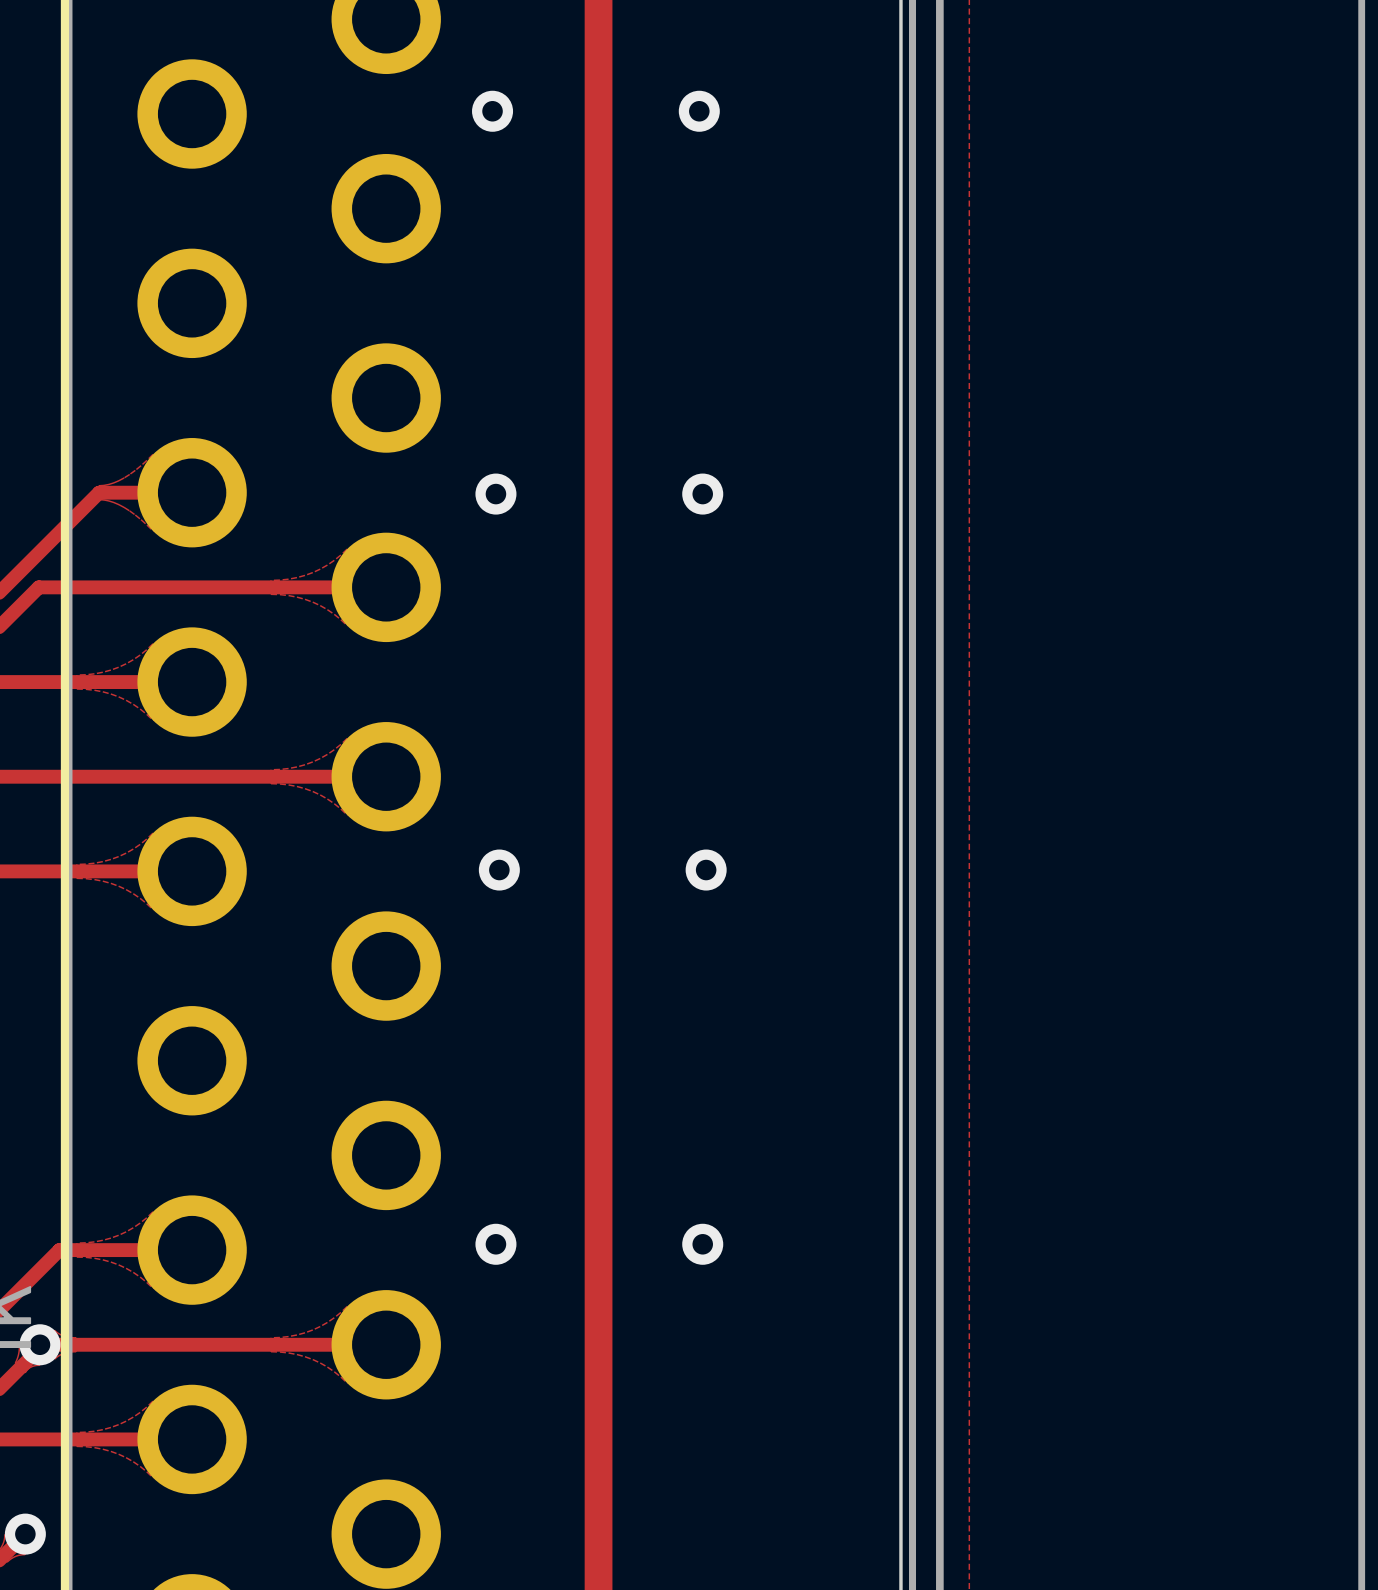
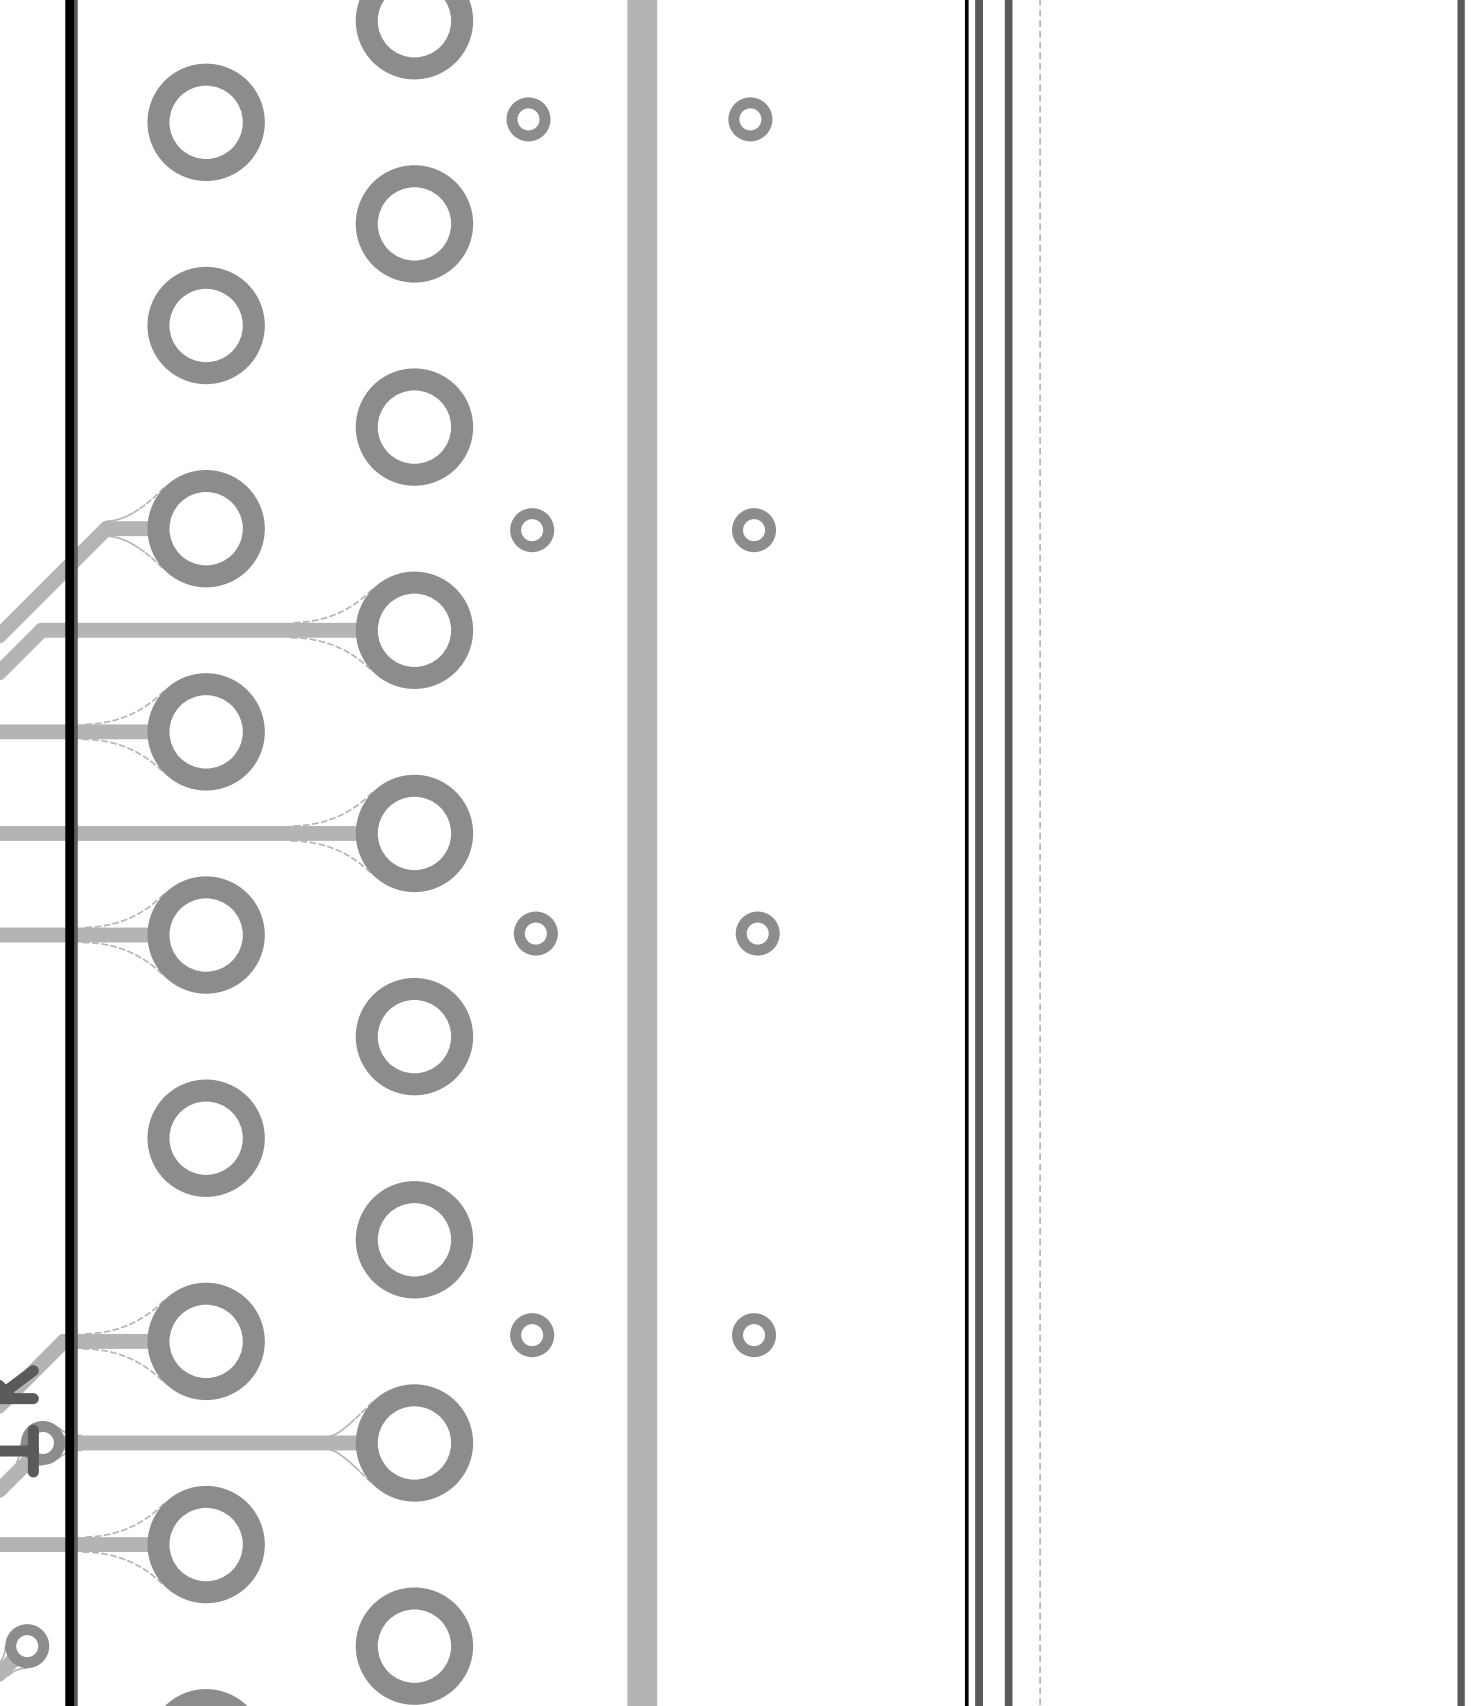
zone outline: (347, 1306) (327, 1322) (312, 1329) (288, 1336) (270, 1337) (270, 1351) (288, 1352) (312, 1359) (327, 1367) (347, 1383) -> (372, 1401) (345, 1427) (331, 1435) (331, 1450) (345, 1458) (372, 1484)

